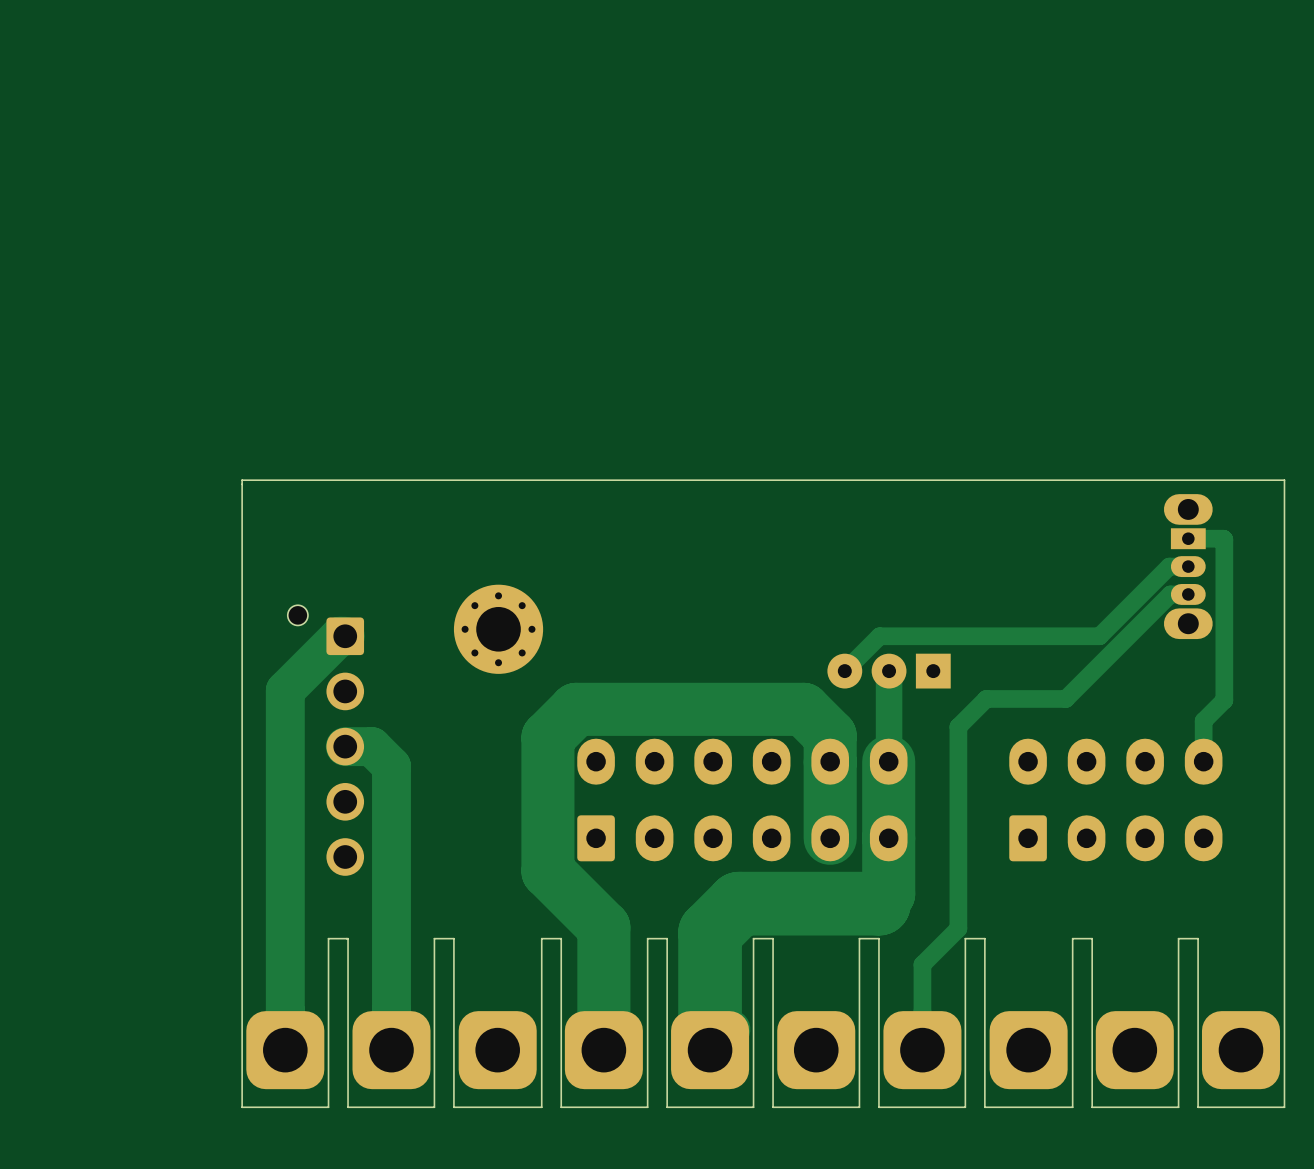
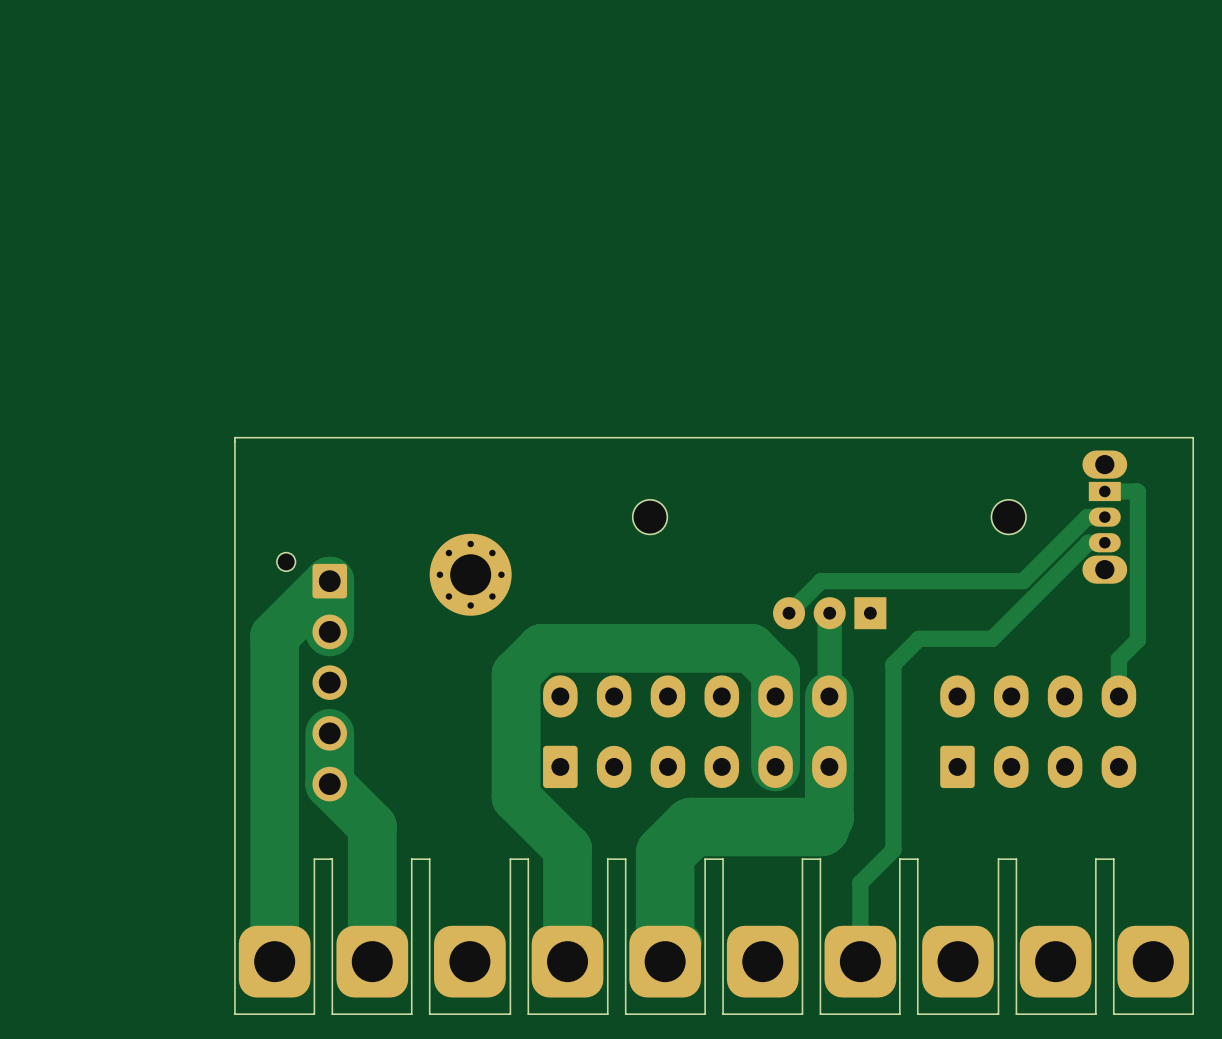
part: none -> (650, 517)
part: none -> (1008, 517)
track: (345, 636) (339, 636) (285, 690) (285, 696) -> (329, 631) (329, 581) (274, 636)
track width: thin (285, 696) (285, 1050) -> thick (274, 636) (274, 961)
track: (345, 746) (371, 746) (391, 766) (391, 903) -> (329, 733) (329, 784) (372, 826)
track width: thin (391, 903) (391, 1050) -> thick (372, 826) (372, 961)

